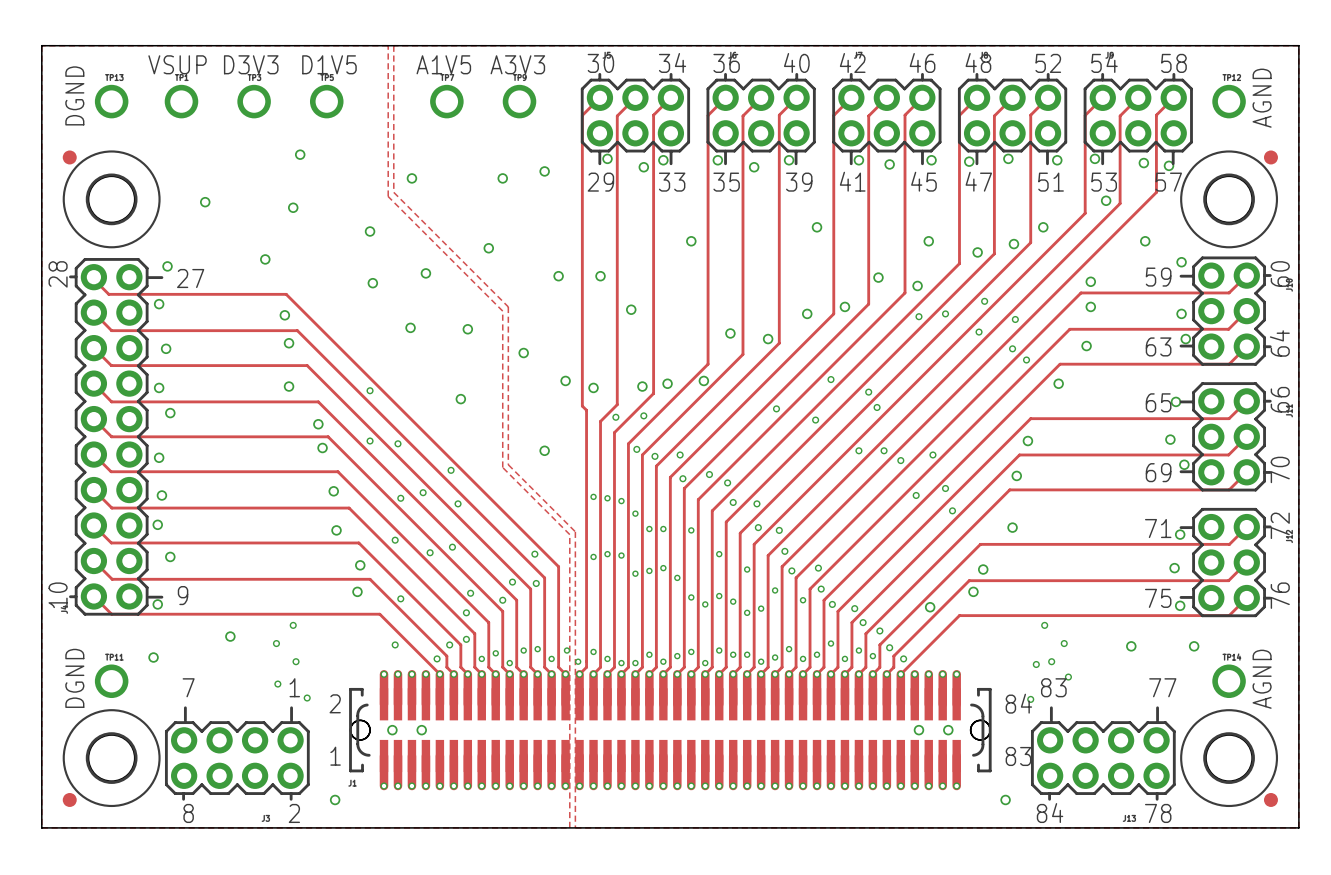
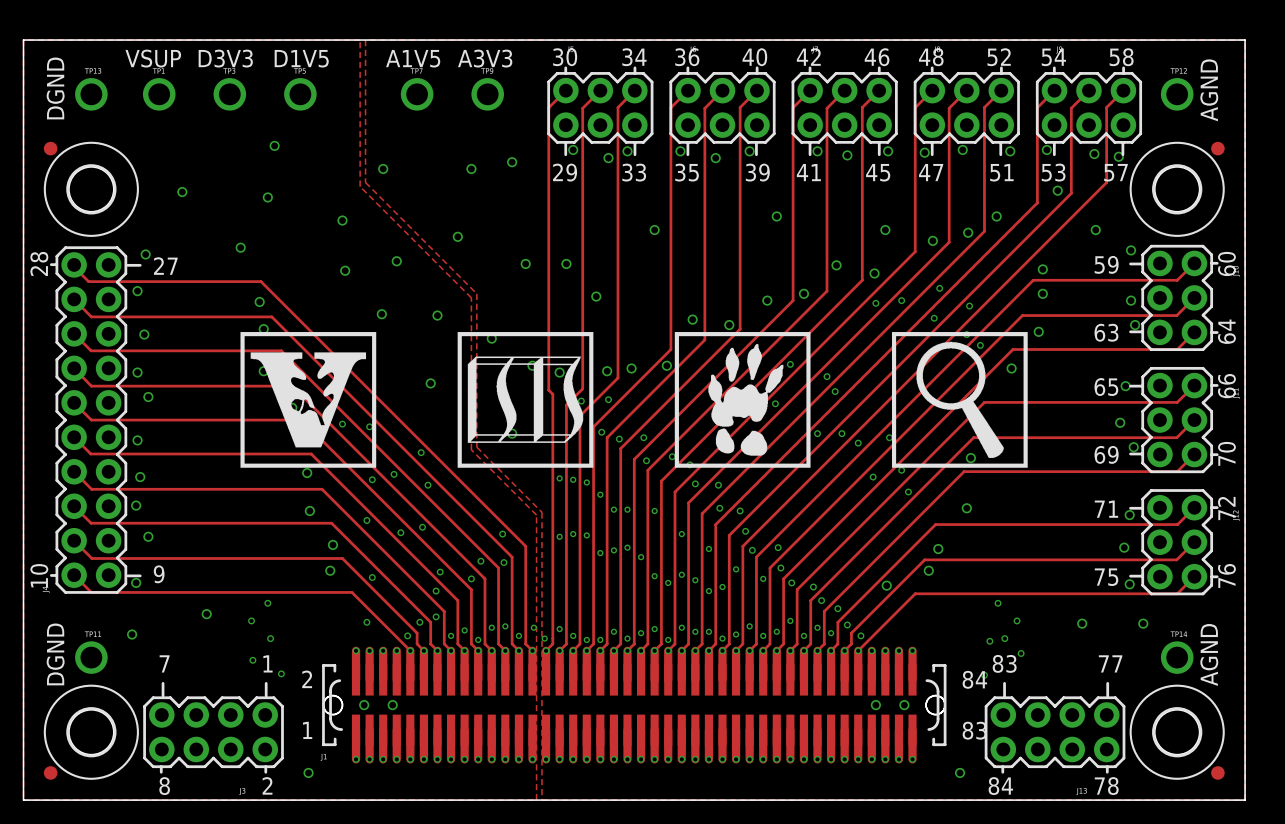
drawing: none -> [240, 332, 377, 468]
drawing: none -> [457, 332, 594, 468]
drawing: none -> [674, 332, 811, 468]
drawing: none -> [891, 332, 1028, 468]

